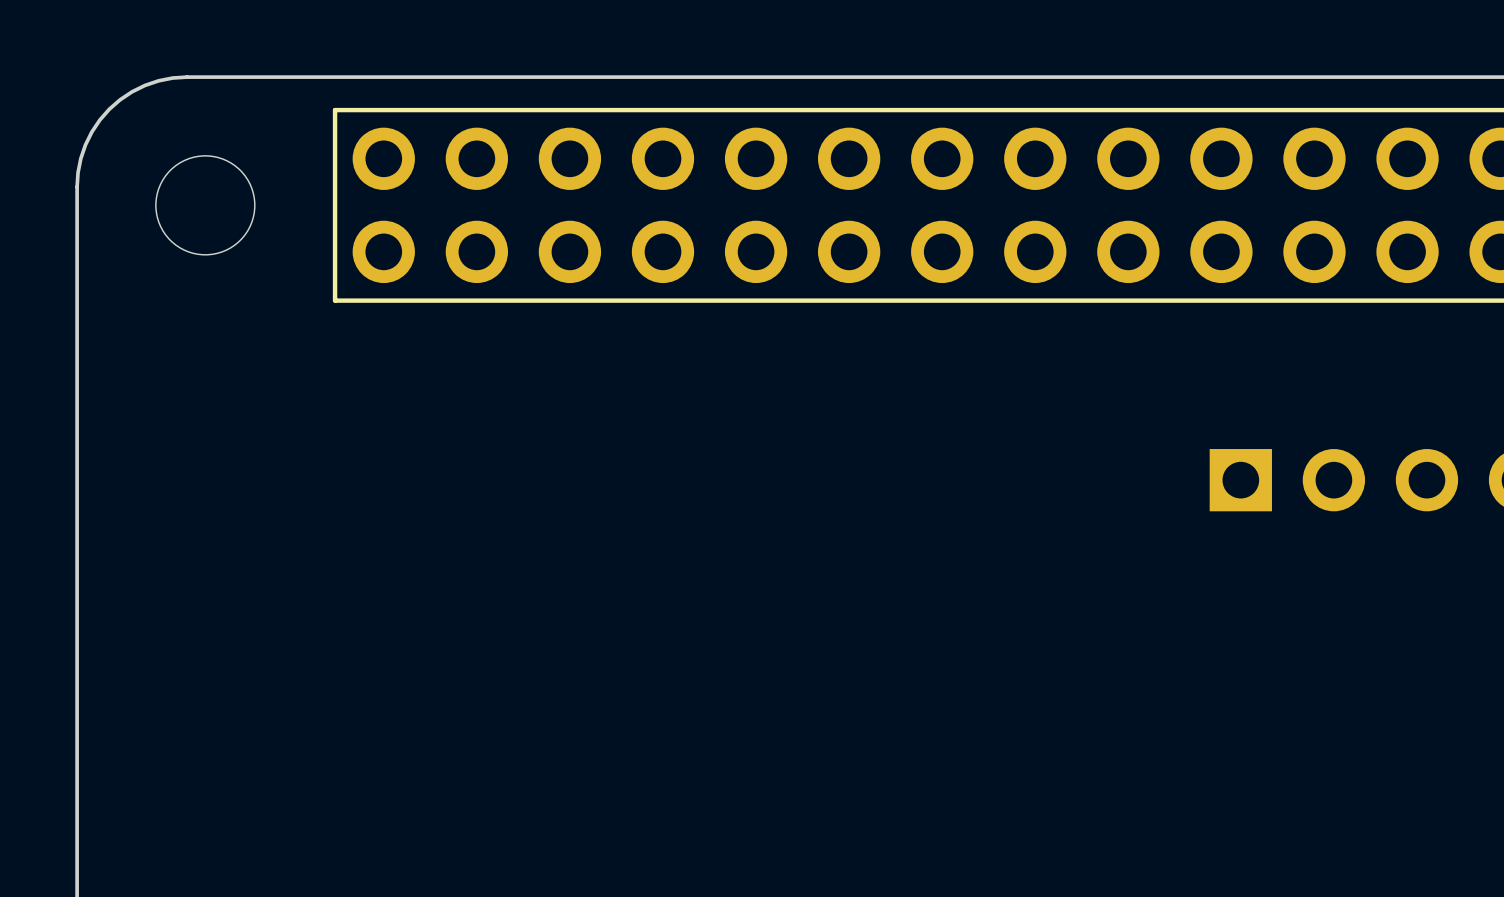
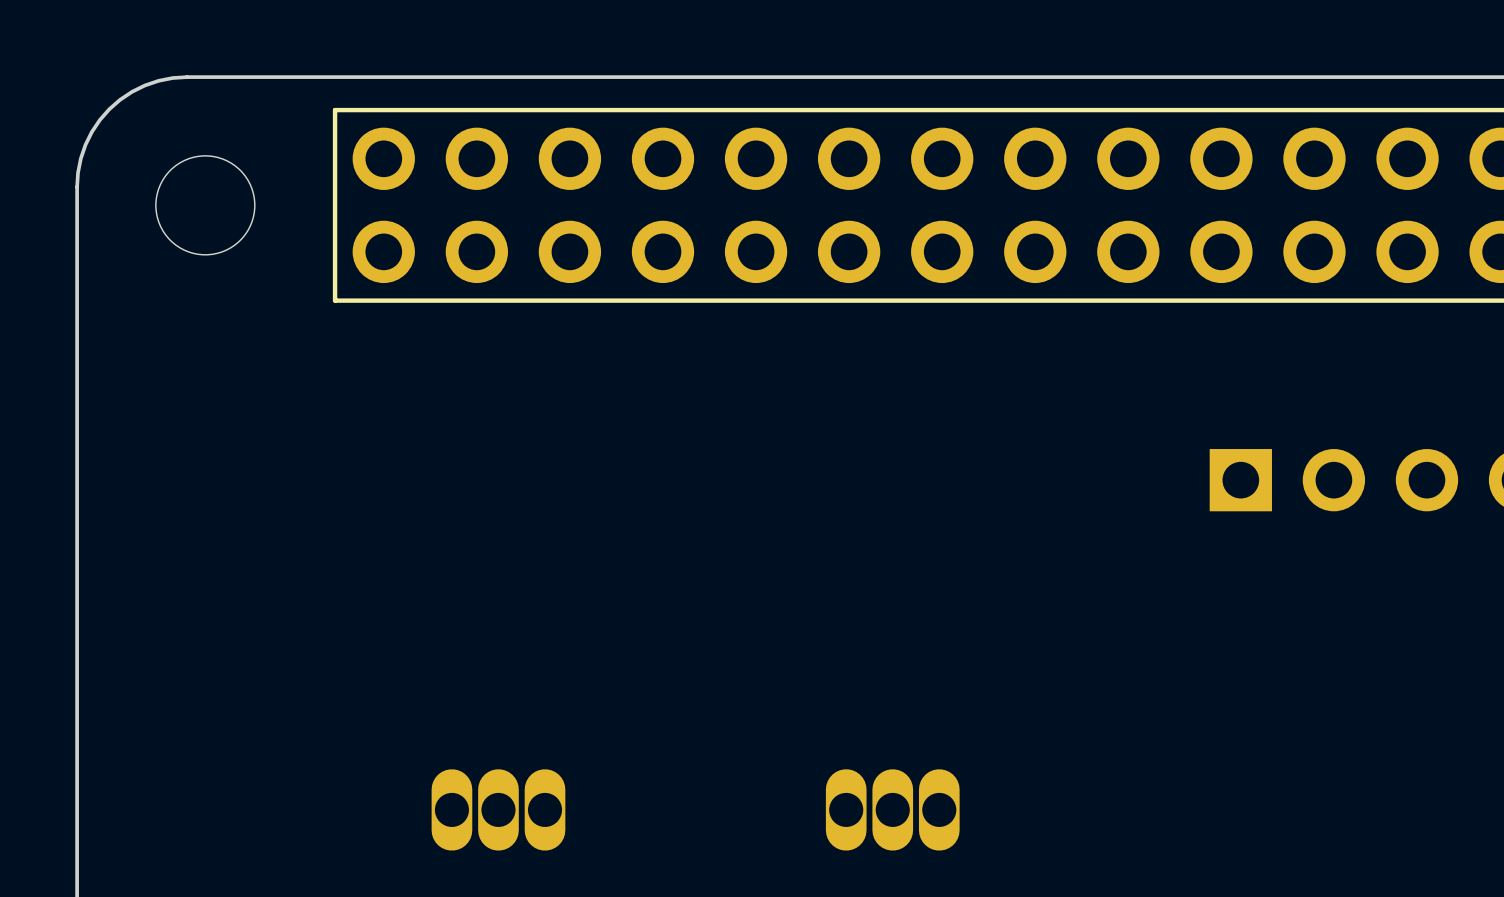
part: none -> (498, 809)
part: none -> (892, 809)

